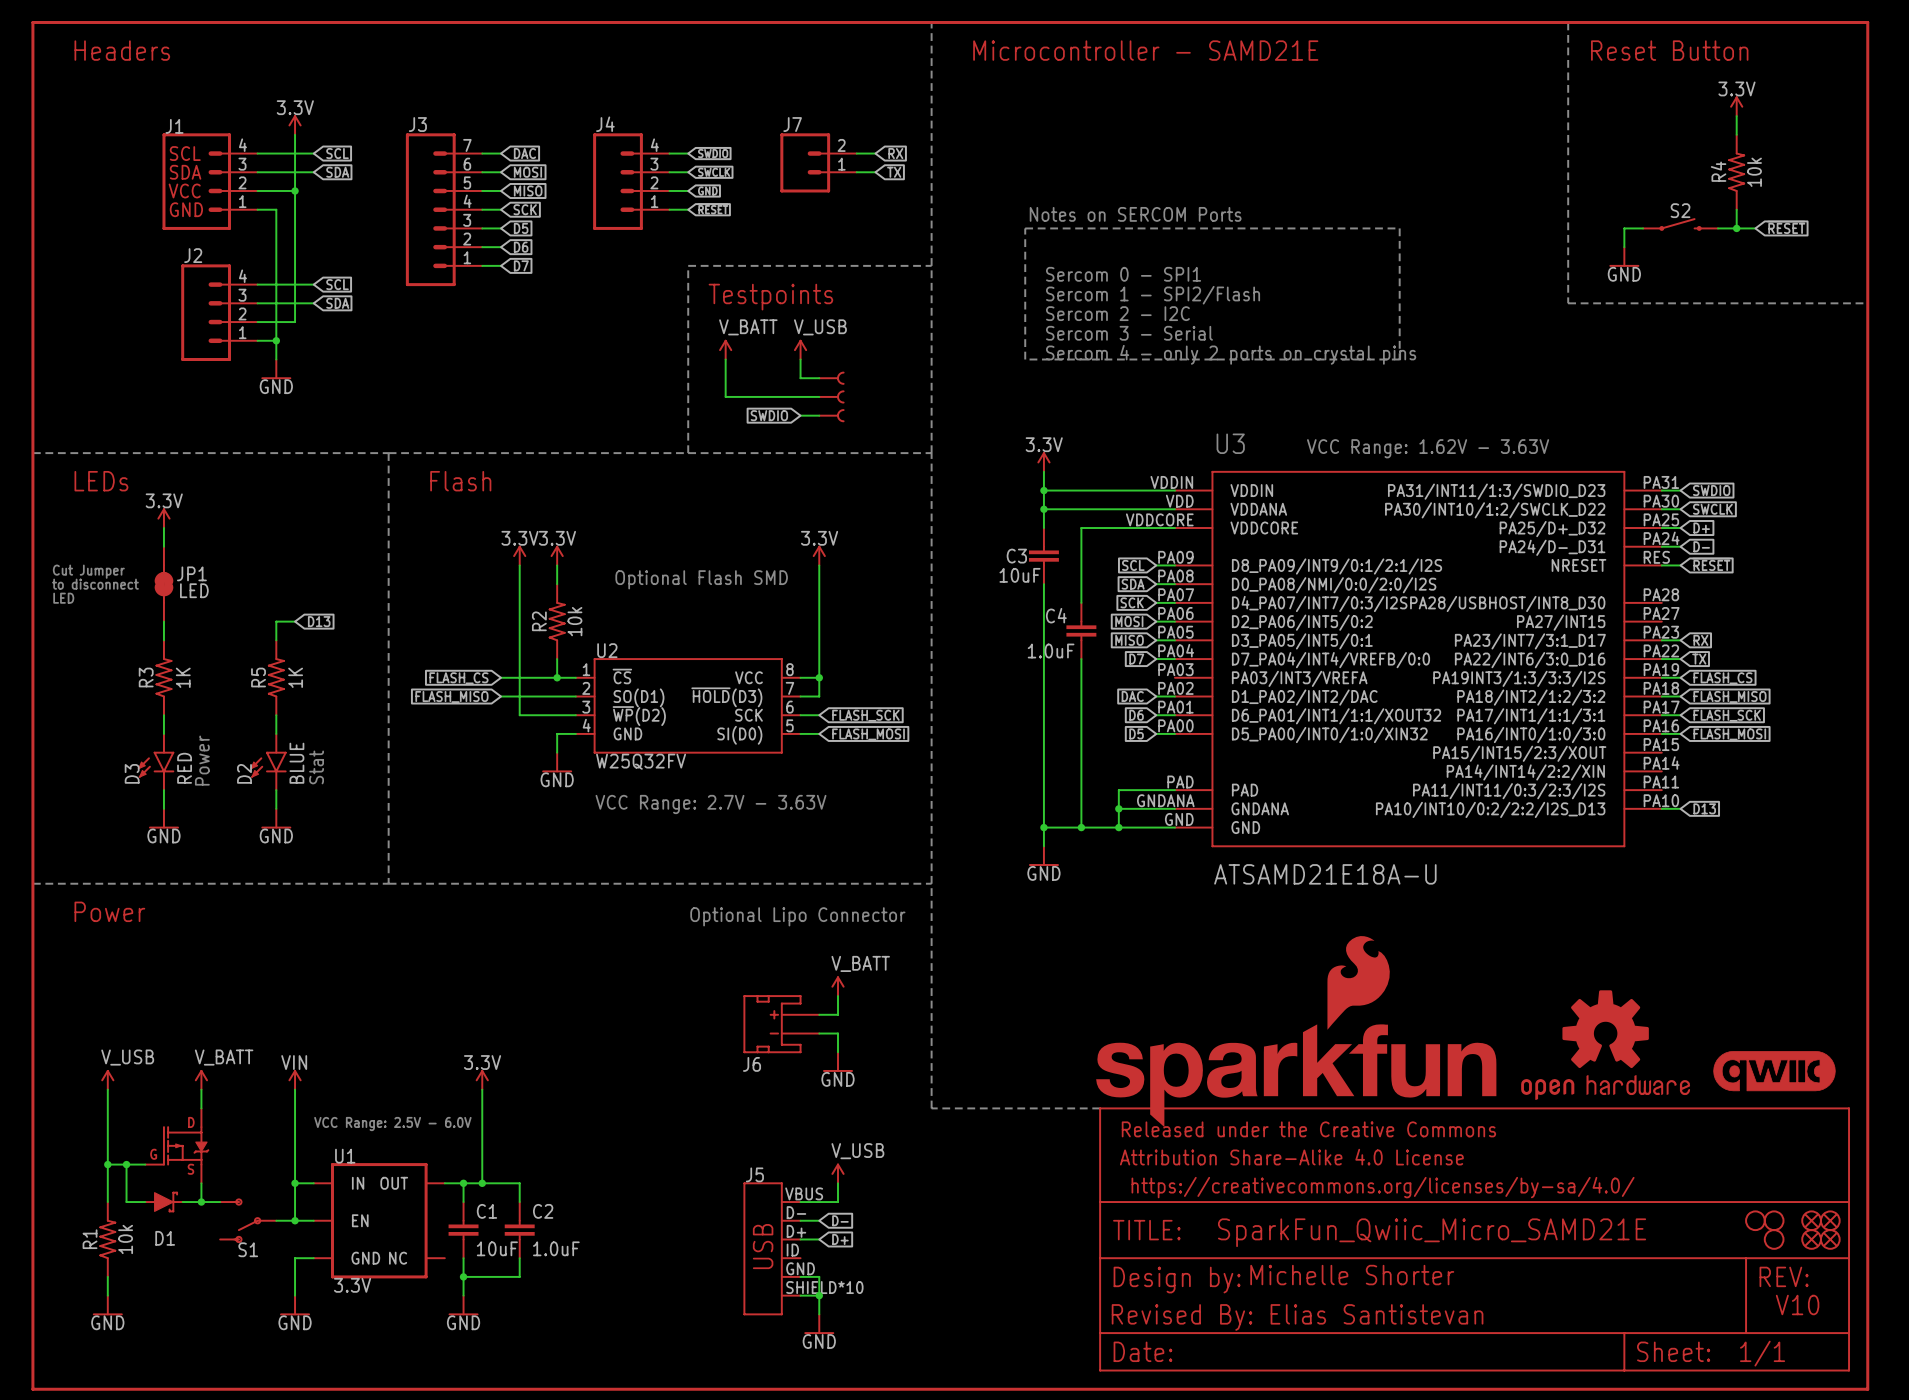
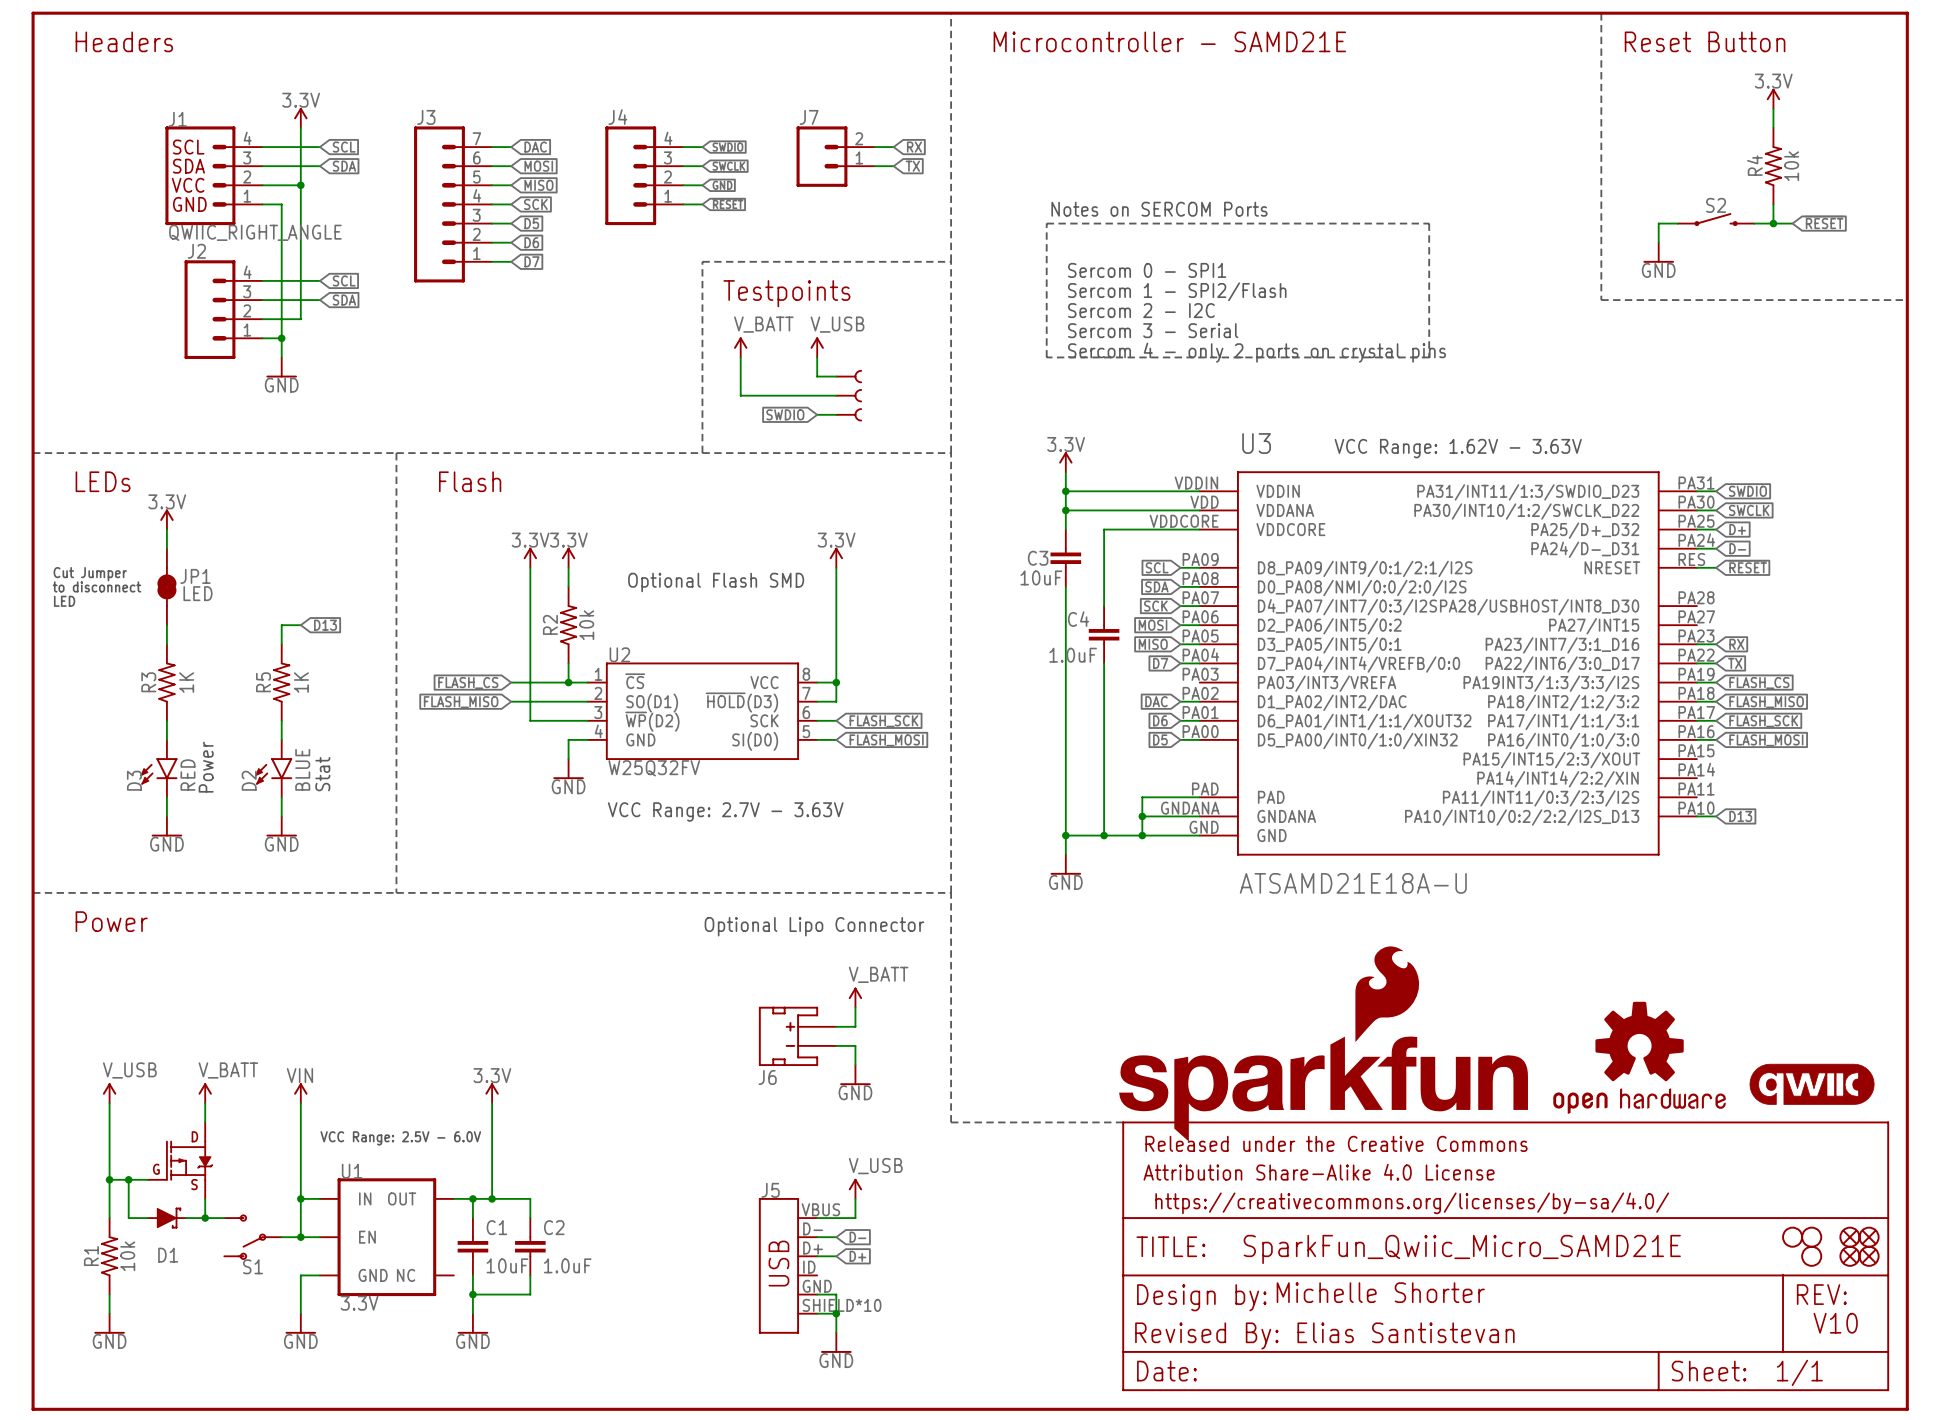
J1 value: none -> QWIIC_RIGHT_ANGLE (255, 232)
part pin name: PA23/INT7/3:1_D17 (1530, 641) -> PA23/INT7/3:1_D16 (1562, 645)
part pin name: PA22/INT6/3:0_D16 (1530, 660) -> PA22/INT6/3:0_D17 (1562, 664)

